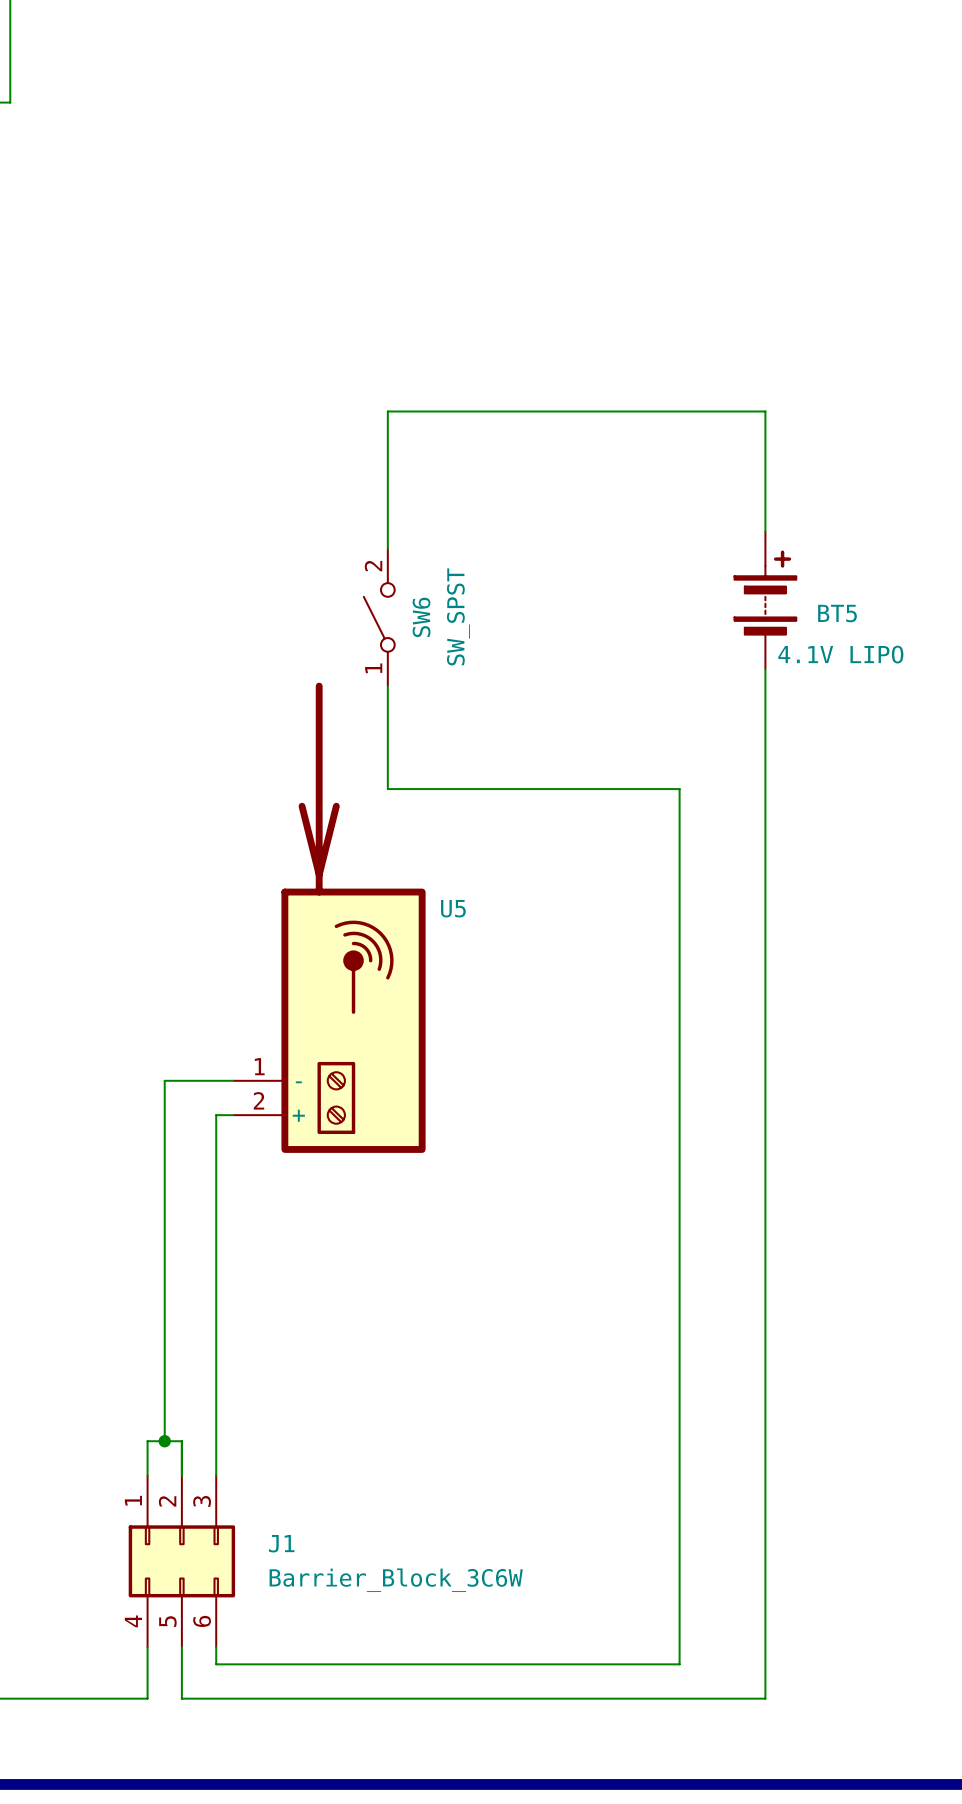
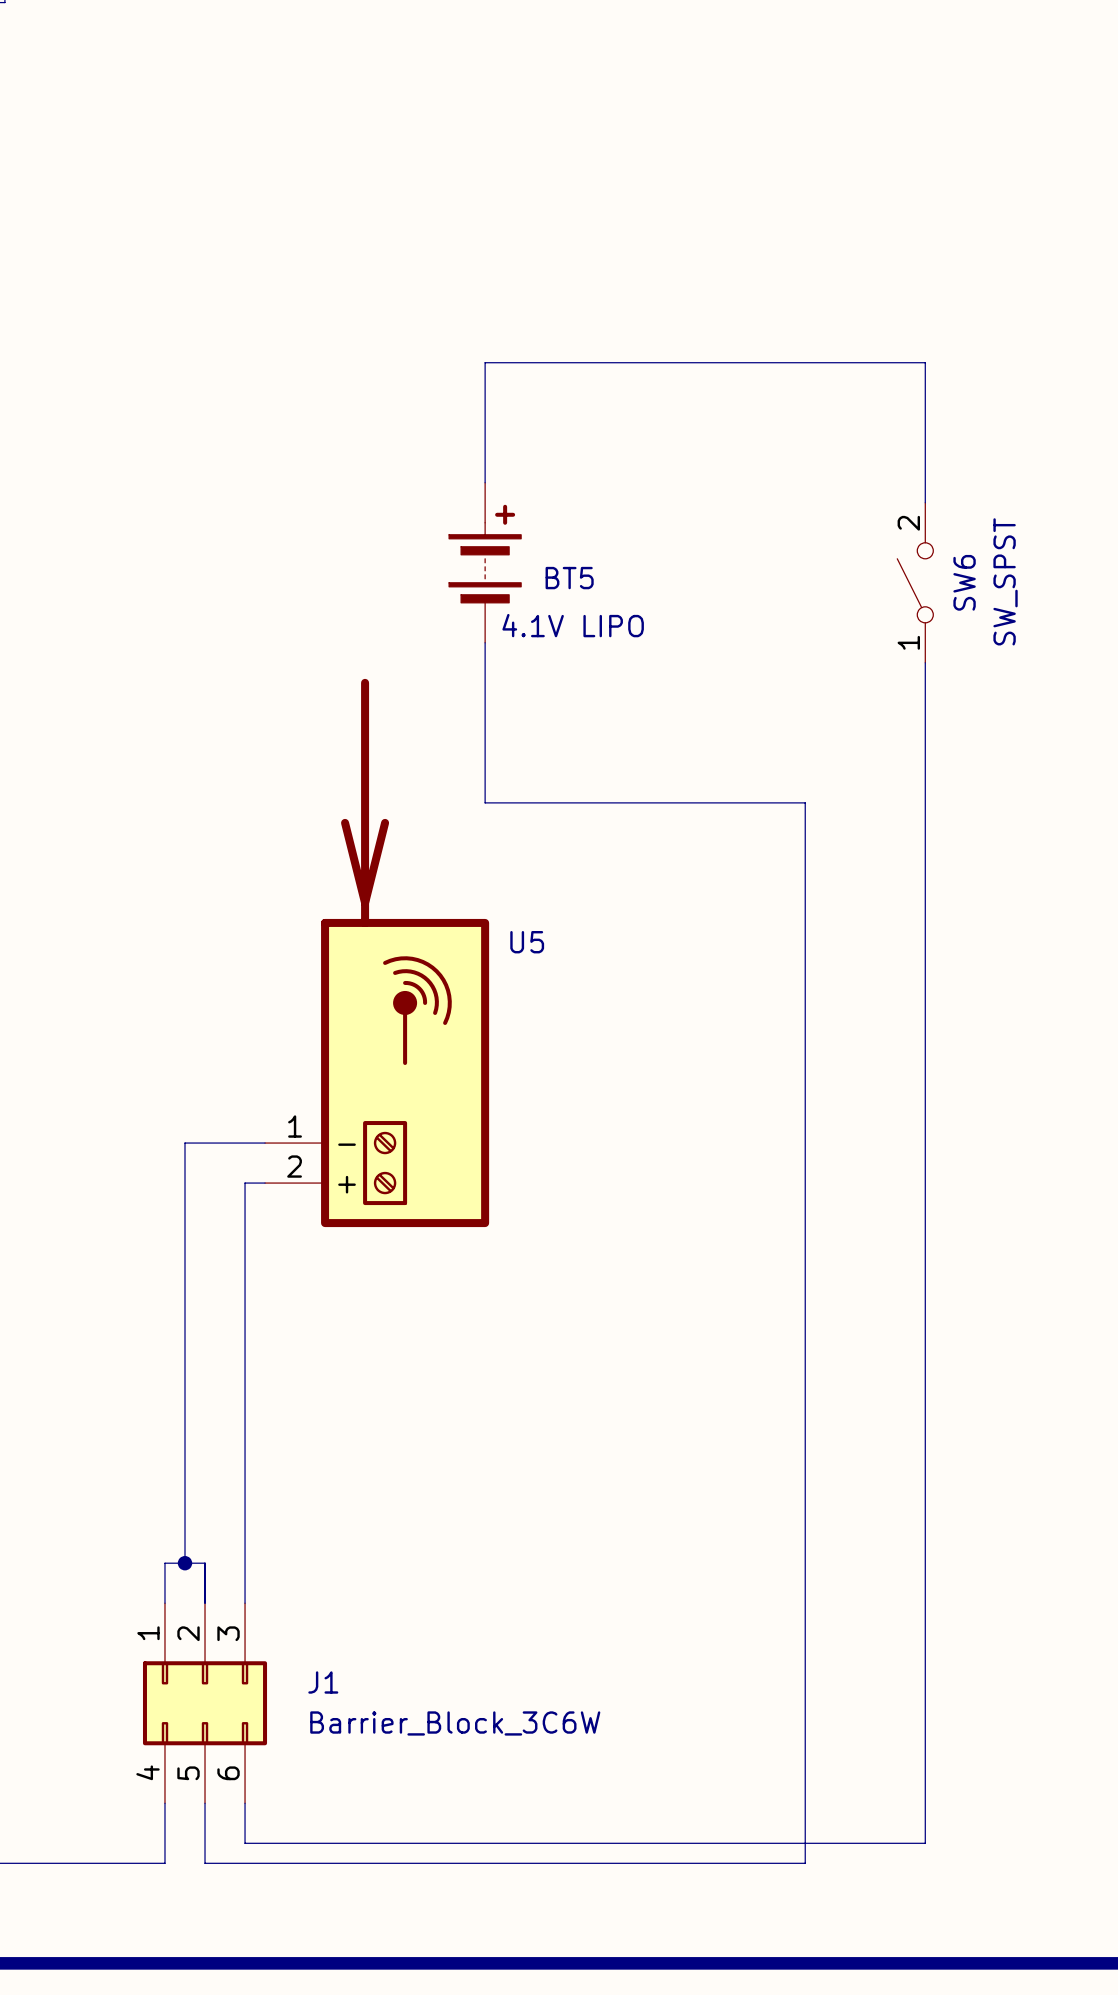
wire: (422, 411) (387, 411) (387, 548) -> (485, 362) (485, 482)
wire: (765, 411) (765, 531) -> (885, 362) (925, 362) (925, 502)
BT5 position: (765, 600) -> (485, 562)
SW6 position: (379, 617) -> (915, 582)
wire: (765, 668) (765, 1698) (696, 1698) -> (785, 802) (805, 802) (805, 1863)
wire: (387, 686) (387, 789) (422, 789) -> (485, 642) (485, 802)
wire: (679, 789) (679, 1664) (216, 1664) -> (925, 662) (925, 1843) (245, 1843) (245, 1823)

